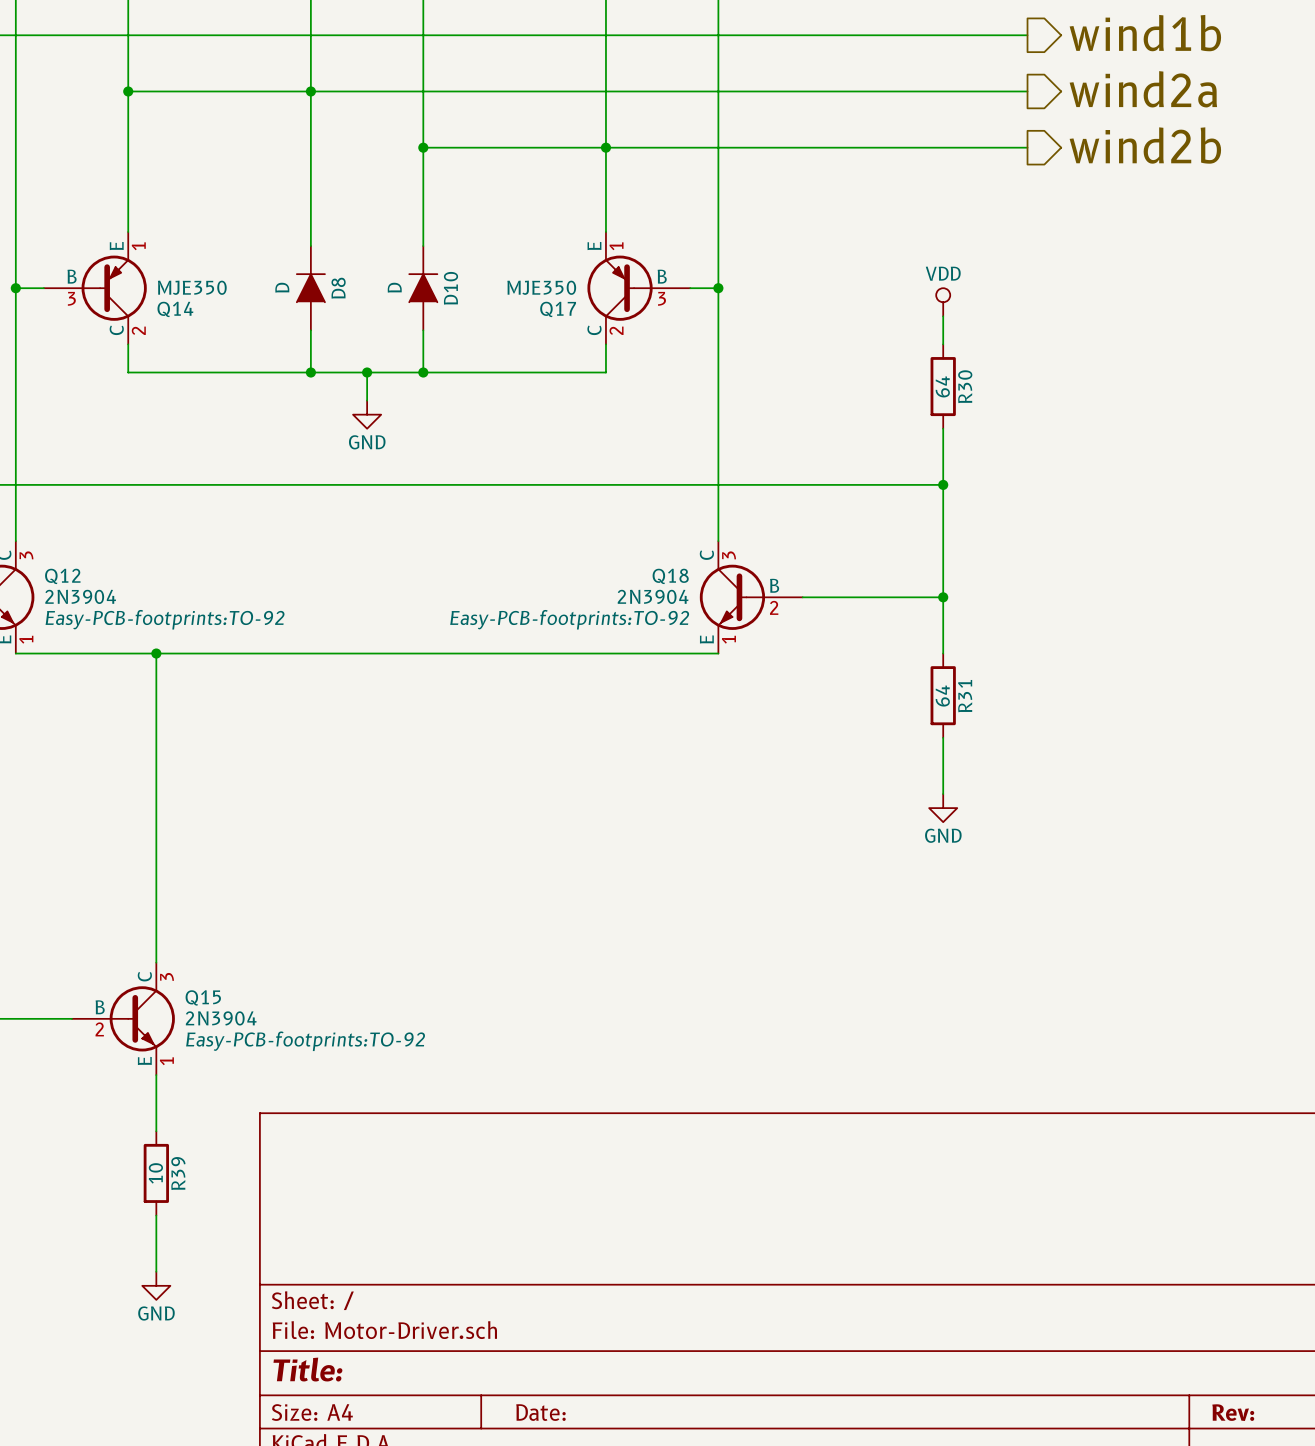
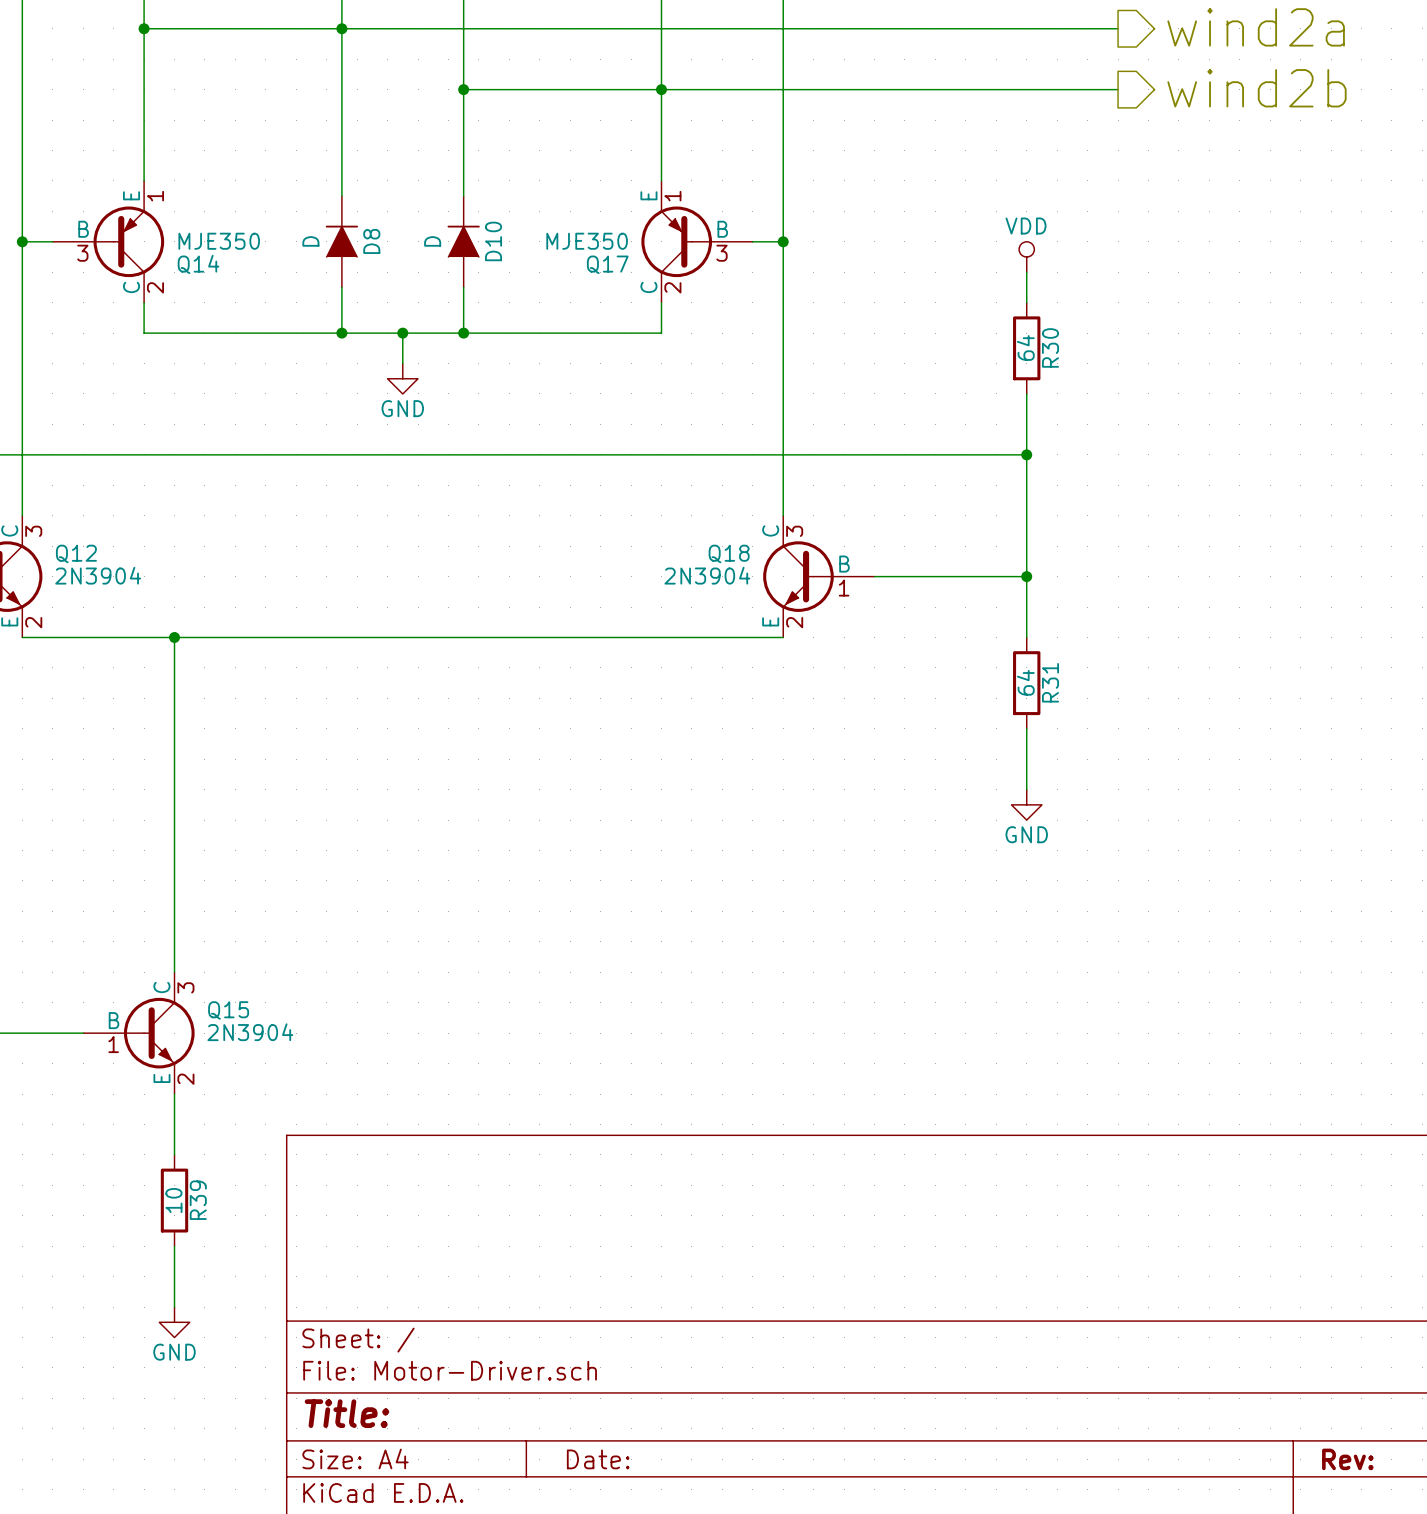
Q18 pin number: 2 (774, 607) -> 1 (844, 588)
Q12 text: Easy-PCB-footprints:TO-92 (165, 619) -> none
Q18 text: Easy-PCB-footprints:TO-92 (569, 619) -> none
Q12 pin number: 1 (26, 639) -> 2 (33, 622)
Q18 pin number: 1 (728, 639) -> 2 (794, 622)
Q15 pin number: 2 (99, 1029) -> 1 (113, 1044)
Q15 text: Easy-PCB-footprints:TO-92 (305, 1041) -> none
Q15 pin number: 1 (166, 1061) -> 2 (185, 1079)

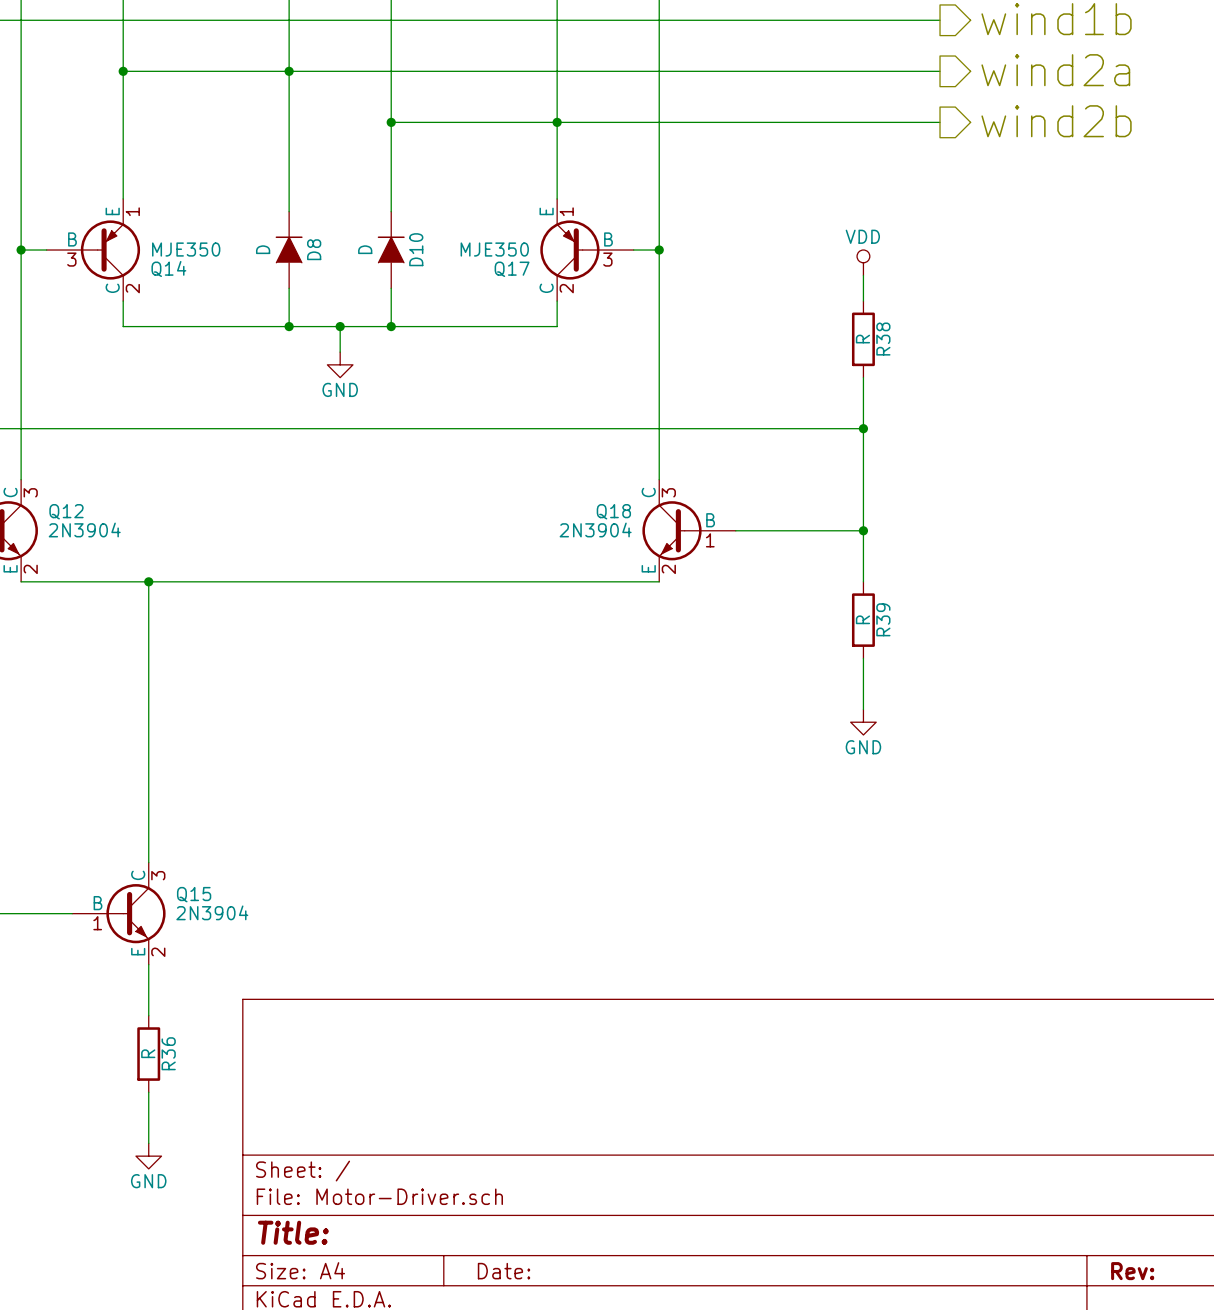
R30 value: 64 (1025, 347) -> R (862, 339)
R30 name: R30 (1050, 347) -> R38 (883, 339)
R31 value: 64 (1025, 682) -> R (862, 619)
R31 name: R31 (1050, 682) -> R39 (883, 619)
R39 value: 10 (173, 1200) -> R (148, 1053)
R39 name: R39 (198, 1200) -> R36 (168, 1053)

